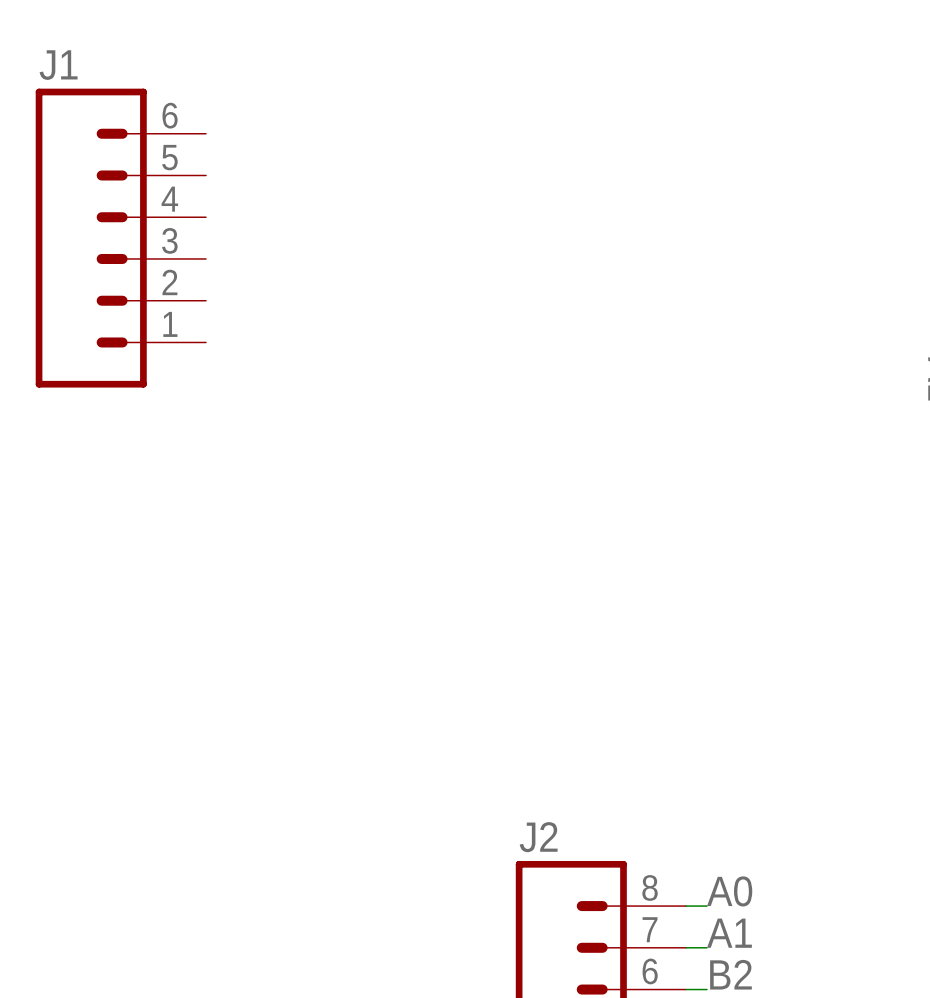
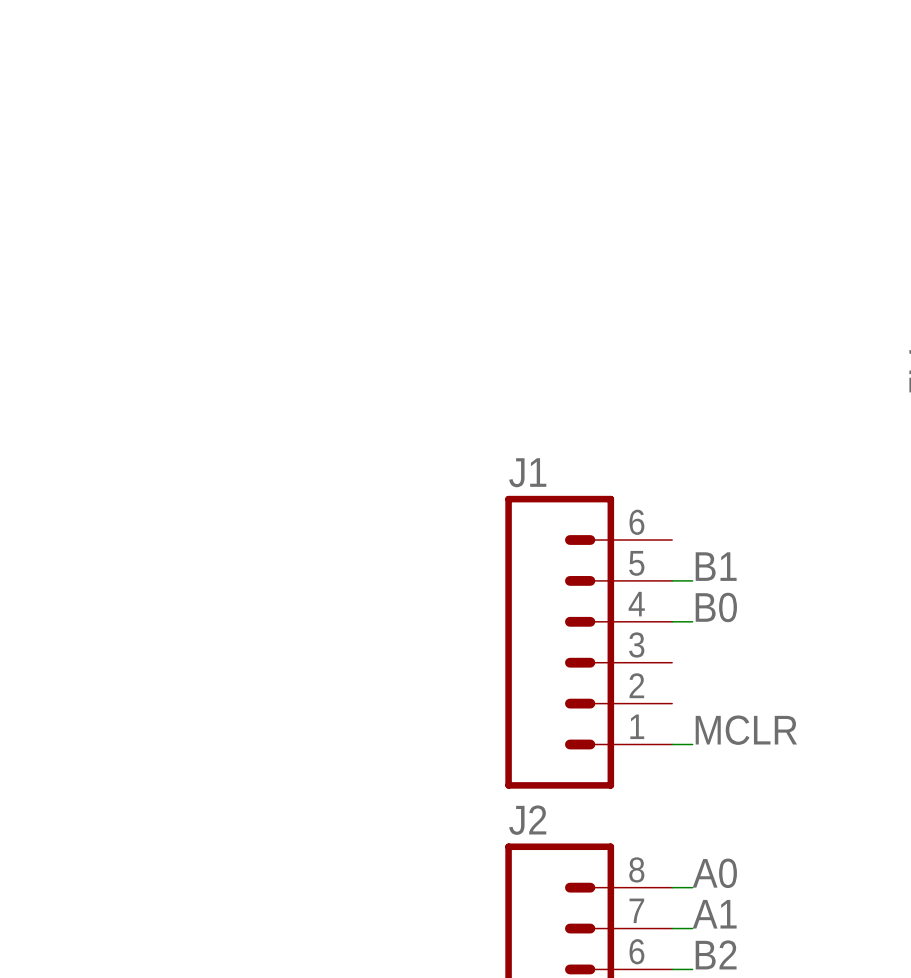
J1 position: (120, 238) -> (588, 642)
label: none -> B1 (716, 566)
wire: none -> (672, 580) (692, 580)
label: none -> B0 (716, 607)
wire: none -> (672, 621) (692, 621)
label: none -> MCLR (746, 730)
wire: none -> (672, 744) (692, 744)

